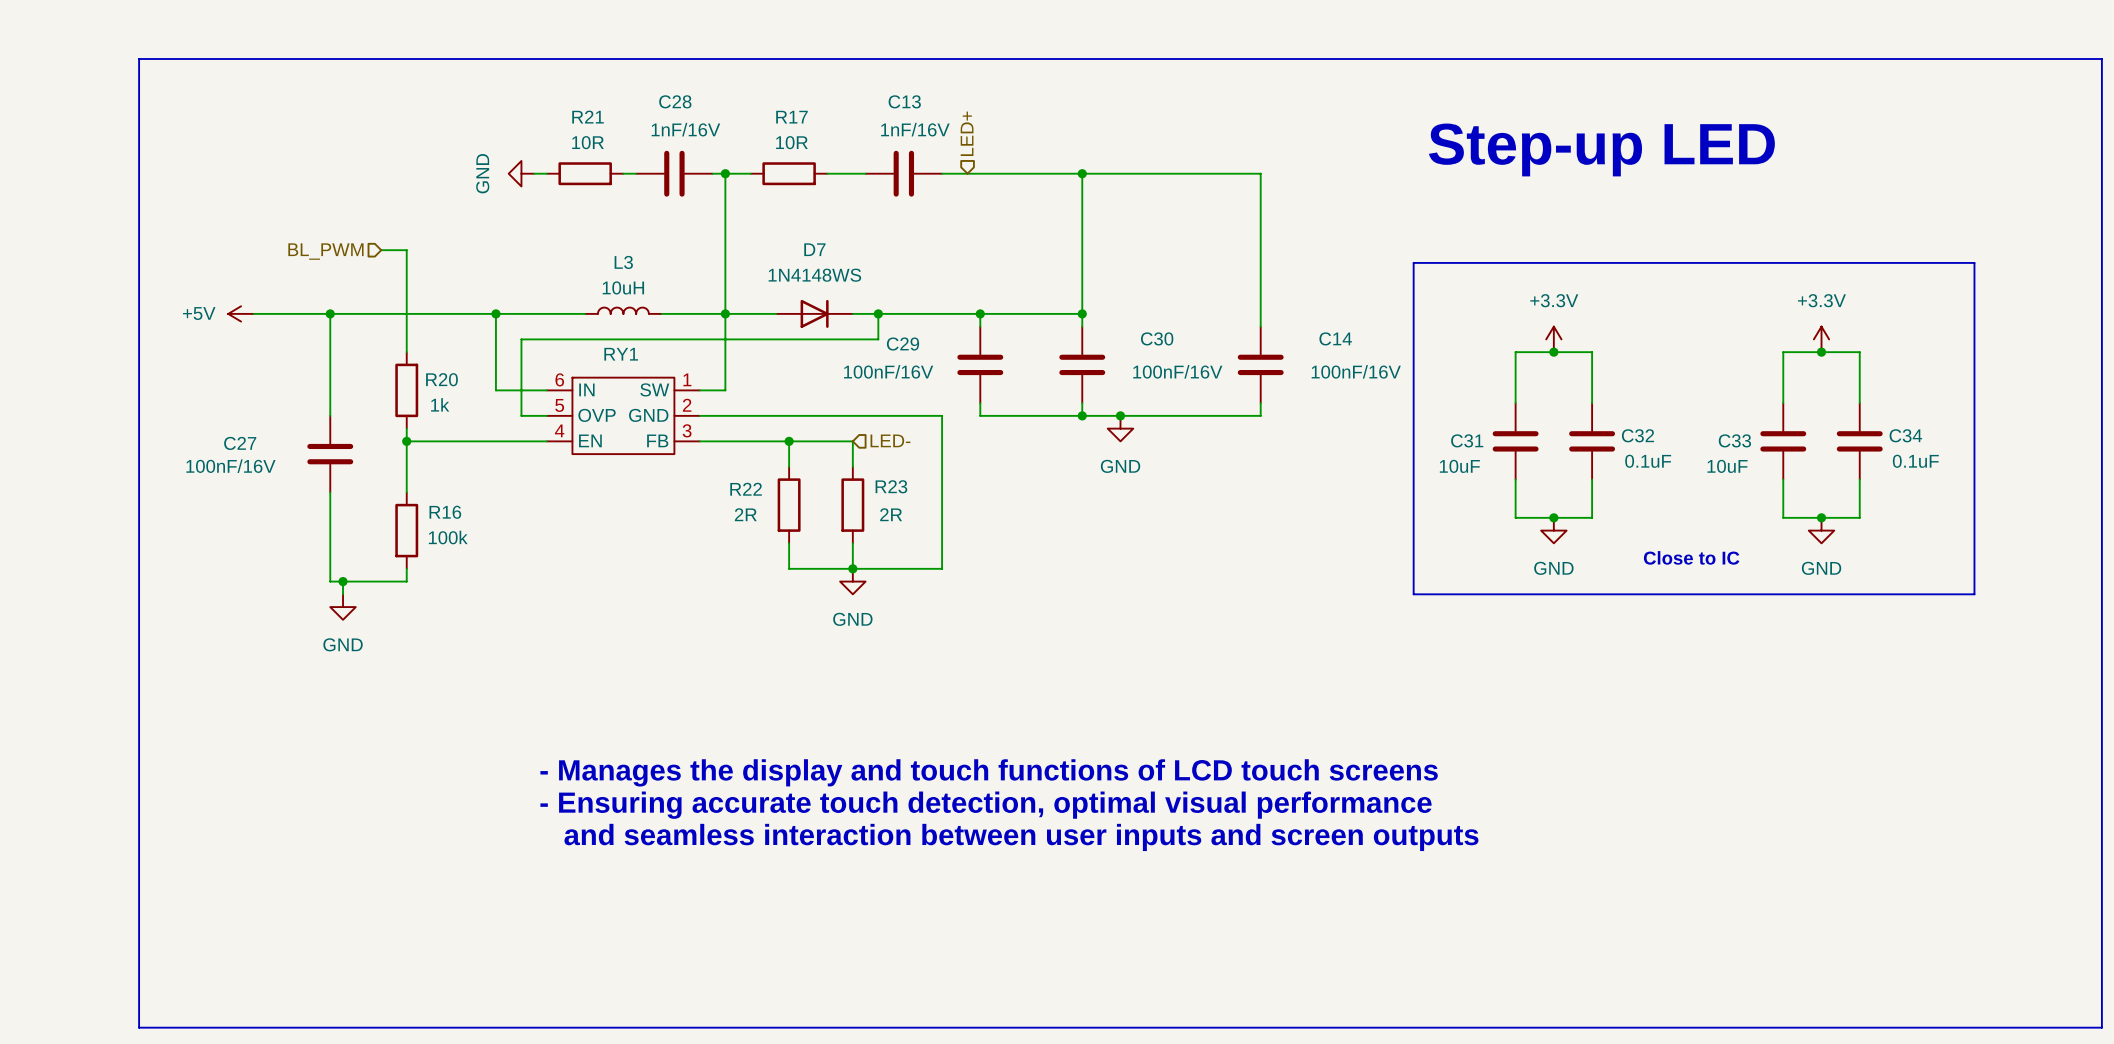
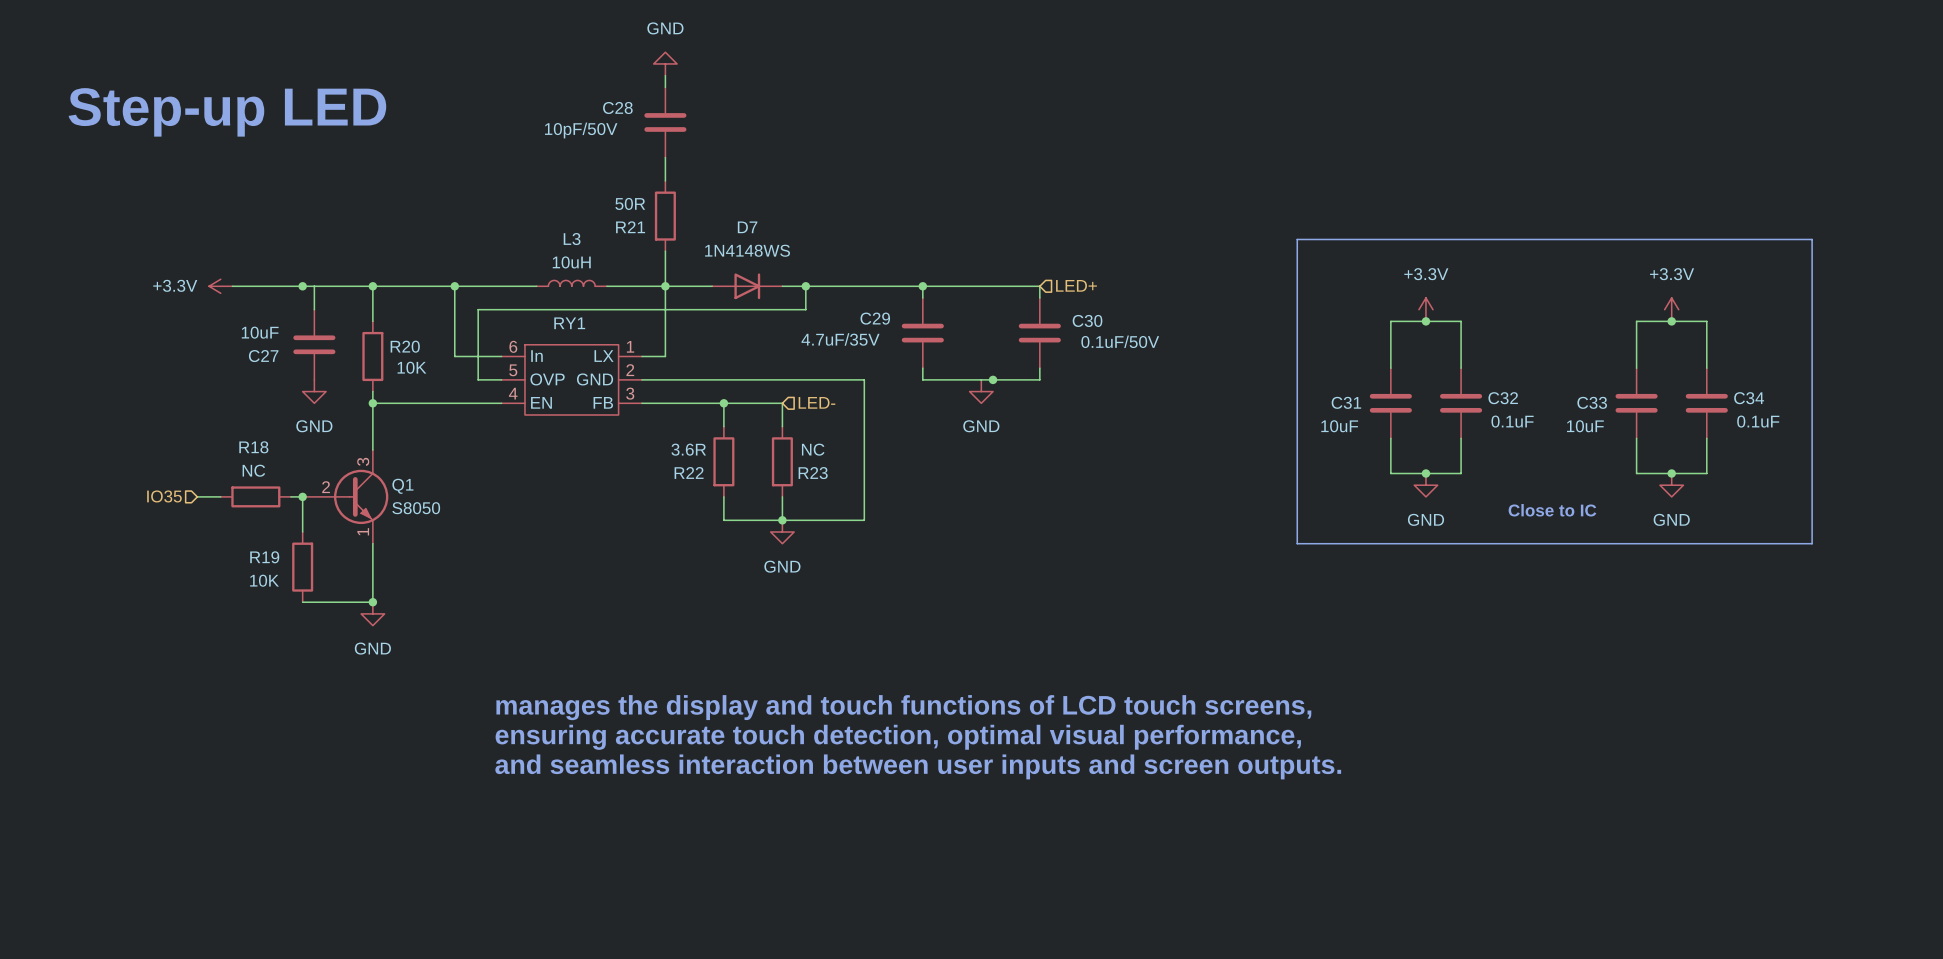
line: (139, 59) (2101, 59) (2101, 1027) (139, 1027) (139, 59) -> none
power symbol: none -> GND (665, 63)
wire: none -> (665, 75) (665, 87)
C28 name position: C28 (675, 101) -> C28 (617, 107)
R21 name position: R21 (588, 117) -> R21 (630, 227)
text: none -> Step-up LED (227, 112)
C28 value: 1nF/16V (685, 129) -> 10pF/50V (581, 130)
hierarchical label rotation: 0° (967, 133) -> 90° clockwise (1076, 285)
hierarchical label position: LED+ (967, 133) -> LED+ (1076, 285)
R21 value: 10R (588, 142) -> 50R (630, 203)
text: Step-up LED (1601, 149) -> none
power symbol: GND (521, 173) -> none
wire: (534, 173) (546, 173) -> none
R21 rotation: 0° (585, 173) -> 90° clockwise (665, 216)
R21 position: (585, 173) -> (665, 216)
wire: (623, 173) (636, 173) -> none
C28 rotation: 0° (674, 173) -> 90° clockwise (665, 122)
C28 position: (674, 173) -> (665, 122)
wire: (712, 173) (750, 173) -> none
junction: (725, 173) -> none
R17: 10R (789, 173) -> none
wire: (827, 173) (865, 173) -> none
C13: 1nF/16V (903, 173) -> none
wire: (942, 173) (1260, 173) (1260, 326) -> none
wire: (1082, 173) (1082, 326) -> none
junction: (1082, 173) -> none
wire: (725, 199) (725, 275) -> none
wire: (381, 250) (406, 250) (406, 313) -> none
hierarchical label: BL_PWM (325, 251) -> none
power symbol: +5V (241, 313) -> +3.3V (220, 286)
wire: (330, 313) (330, 415) -> none
wire: none -> (314, 286) (314, 309)
junction: none -> (372, 286)
wire: (980, 313) (980, 326) -> (922, 286) (922, 297)
junction position: (980, 313) -> (922, 286)
wire: none -> (993, 286) (1039, 286) (1039, 297)
junction: (1082, 313) -> none
C30 name position: C30 (1157, 338) -> C30 (1087, 320)
C29 name position: C29 (903, 344) -> C29 (875, 318)
C29 position: (980, 364) -> (922, 333)
C30 position: (1082, 364) -> (1039, 333)
C14: 100nF/16V (1260, 364) -> none
C29 value: 100nF/16V (888, 371) -> 4.7uF/35V (840, 339)
C30 value: 100nF/16V (1177, 371) -> 0.1uF/50V (1120, 341)
RY1 pin name: IN (586, 389) -> In (536, 356)
RY1 pin name: SW (654, 389) -> LX (604, 356)
wire: (980, 403) (980, 415) (1005, 415) -> (922, 368) (922, 379)
wire: (1082, 403) (1082, 415) -> none
wire: (1260, 403) (1260, 415) (1133, 415) -> (1039, 368) (1039, 379)
R20 value: 1k (440, 404) -> 10K (411, 367)
junction: (1120, 415) -> none
power symbol: none -> GND (314, 391)
power symbol position: GND (1120, 428) -> GND (981, 391)
C27 name position: C27 (240, 443) -> C27 (263, 356)
C27 position: (330, 454) -> (314, 344)
C27 value: 100nF/16V (230, 466) -> 10uF (260, 332)
R23 name position: R23 (891, 486) -> R23 (813, 473)
R22 name position: R22 (746, 489) -> R22 (689, 472)
wire: (330, 492) (330, 543) -> (290, 496) (302, 496)
R22 value: 2R (745, 514) -> 3.6R (688, 449)
R23 value: 2R (891, 514) -> NC (813, 449)
R16: 100k (406, 530) -> none
hierarchical label: none -> IO35 (164, 496)
wire: none -> (197, 496) (220, 496)
R18: none -> NC (255, 496)
Q1: none -> S8050 (345, 496)
wire: (406, 568) (406, 581) (330, 581) -> none
wire: (343, 581) (343, 594) -> none
junction position: (343, 581) -> (302, 496)
wire: none -> (372, 543) (372, 602) (302, 602)
power symbol: GND (343, 607) -> none
R19: none -> 10K (302, 567)
junction: none -> (372, 602)
power symbol: none -> GND (372, 613)
text: - Manages the display and touch functions of LCD touch screens (989, 772) -> manages the display and touch functions of LCD touch screens, (903, 707)
text: - Ensuring accurate touch detection, optimal visual performance (986, 805) -> ensuring accurate touch detection, optimal visual performance, (898, 737)
text: and seamless interaction between user inputs and screen outputs (1021, 837) -> and seamless interaction between user inputs and screen outputs. (918, 766)

